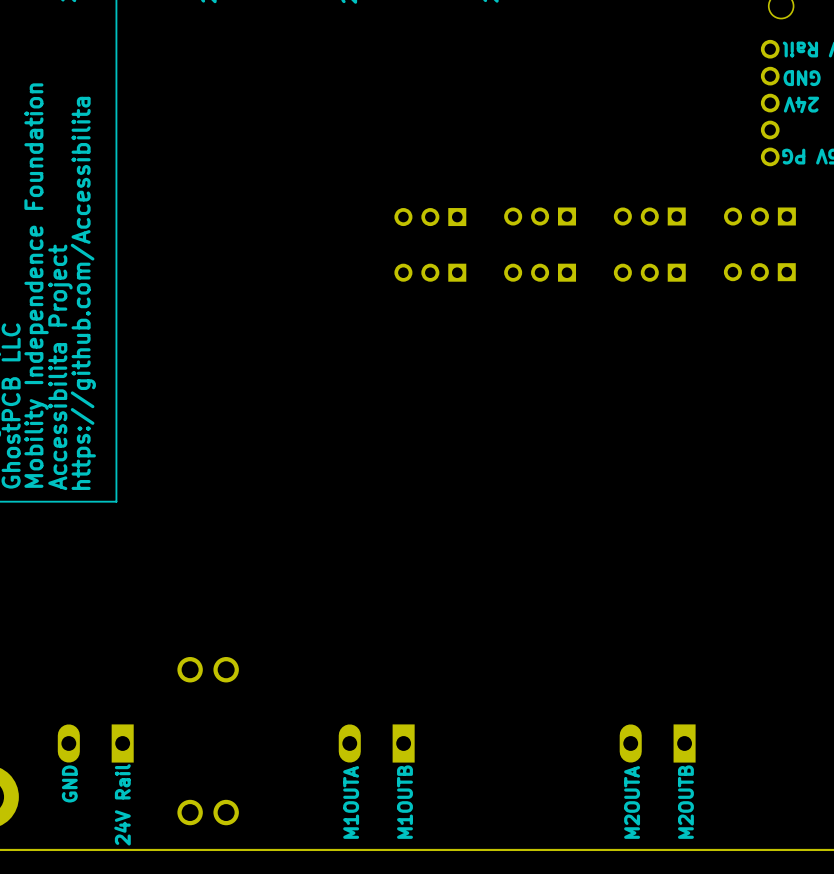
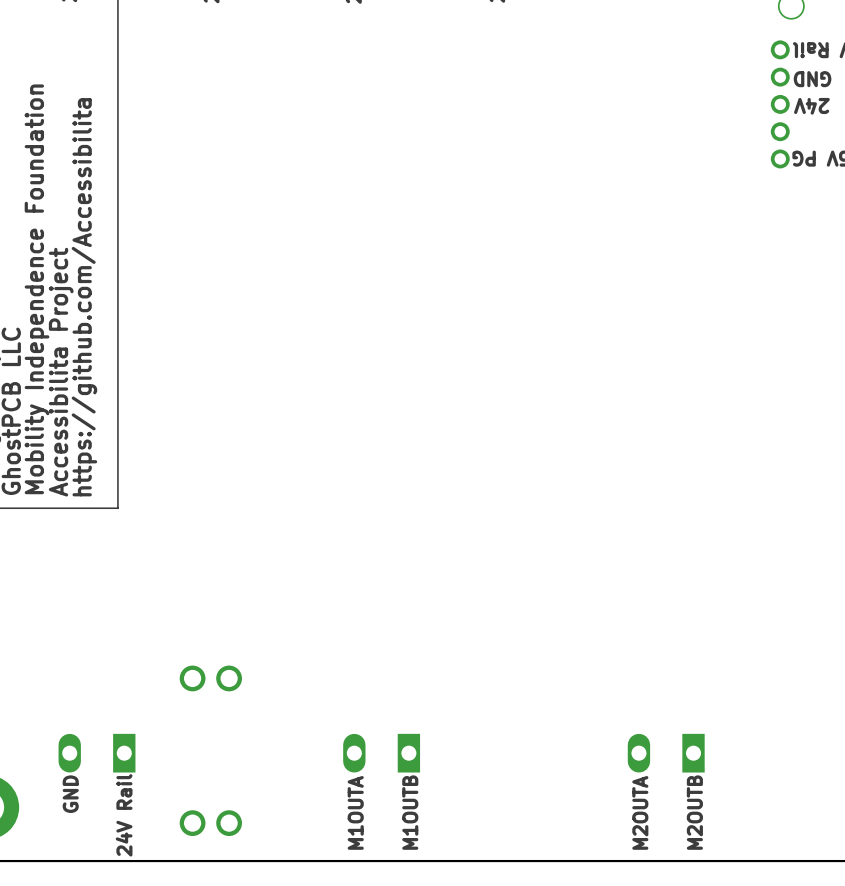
part: (540, 216) -> none
part: (649, 216) -> none
part: (759, 216) -> none
part: (430, 217) -> none
part: (430, 272) -> none
part: (540, 272) -> none
part: (649, 272) -> none
part: (759, 272) -> none

